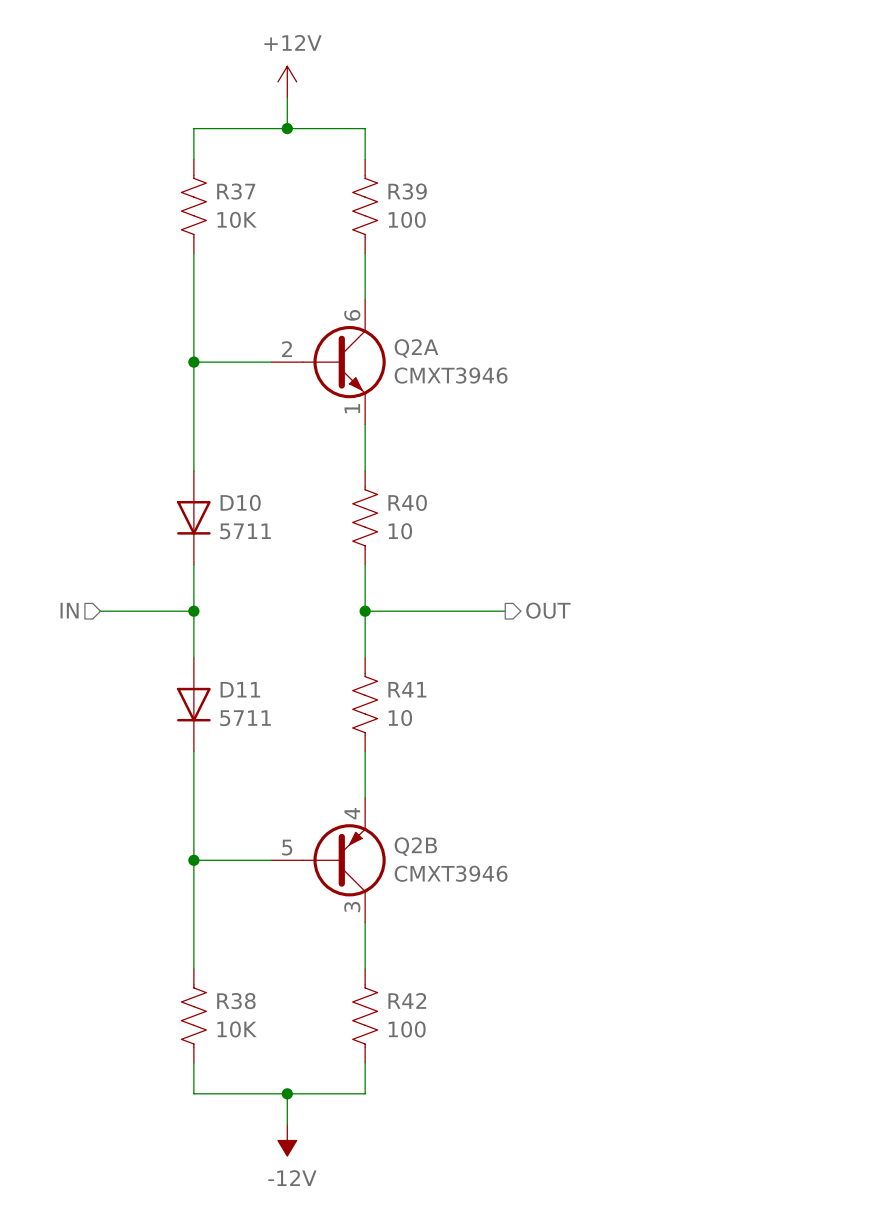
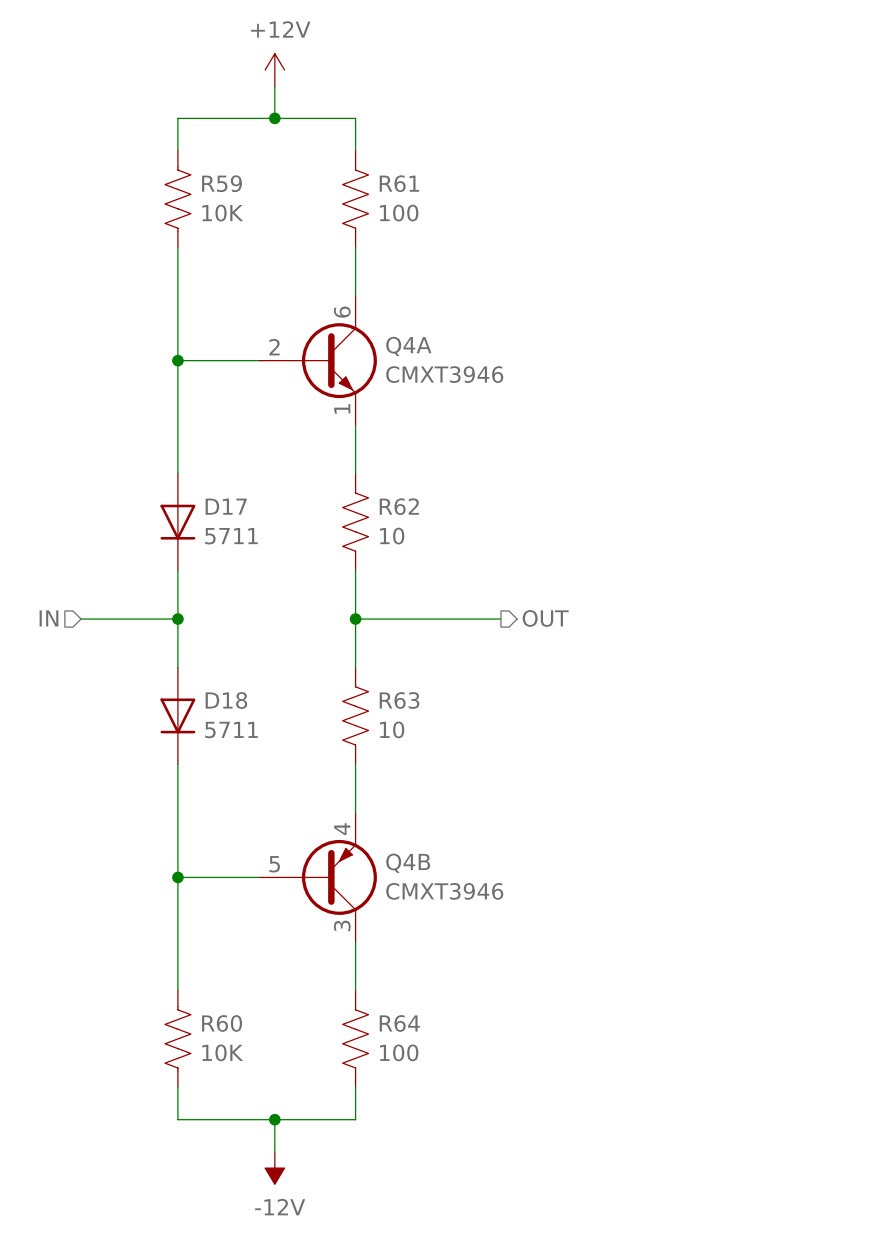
R37 name: R37 (236, 191) -> R59 (222, 183)
R39 name: R39 (407, 191) -> R61 (399, 183)
Q2A name: Q2A (416, 348) -> Q4A (408, 346)
D10 name: D10 (240, 502) -> D17 (226, 506)
R40 name: R40 (407, 502) -> R62 (399, 506)
D11 name: D11 (240, 689) -> D18 (226, 700)
R41 name: R41 (407, 689) -> R63 (399, 700)
Q2B name: Q2B (415, 846) -> Q4B (408, 863)
R42 name: R42 (407, 1000) -> R64 (399, 1023)
R38 name: R38 (236, 1001) -> R60 (222, 1023)

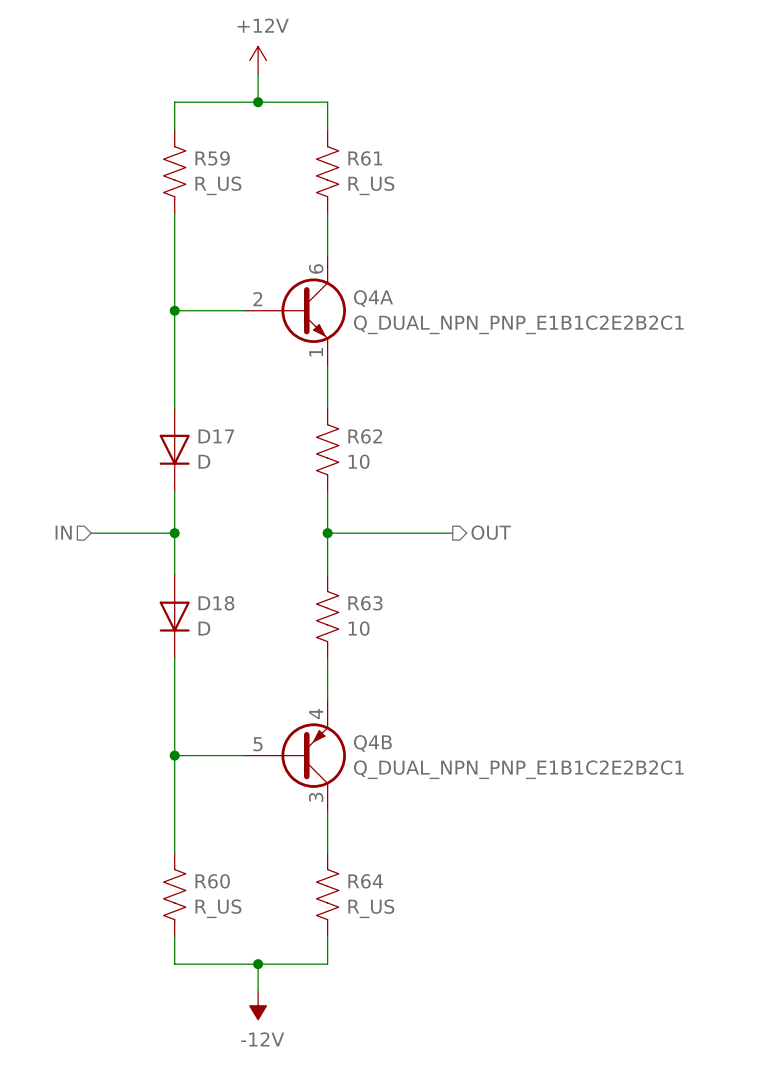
R59 value: 10K (222, 213) -> R_US (218, 185)
R61 value: 100 (399, 213) -> R_US (371, 185)
Q4A value: CMXT3946 (444, 374) -> Q_DUAL_NPN_PNP_E1B1C2E2B2C1 (518, 324)
D17 value: 5711 (231, 536) -> D (204, 461)
D18 value: 5711 (231, 730) -> D (204, 628)
Q4B value: CMXT3946 (444, 891) -> Q_DUAL_NPN_PNP_E1B1C2E2B2C1 (518, 769)
R60 value: 10K (222, 1052) -> R_US (218, 908)
R64 value: 100 (399, 1052) -> R_US (371, 908)

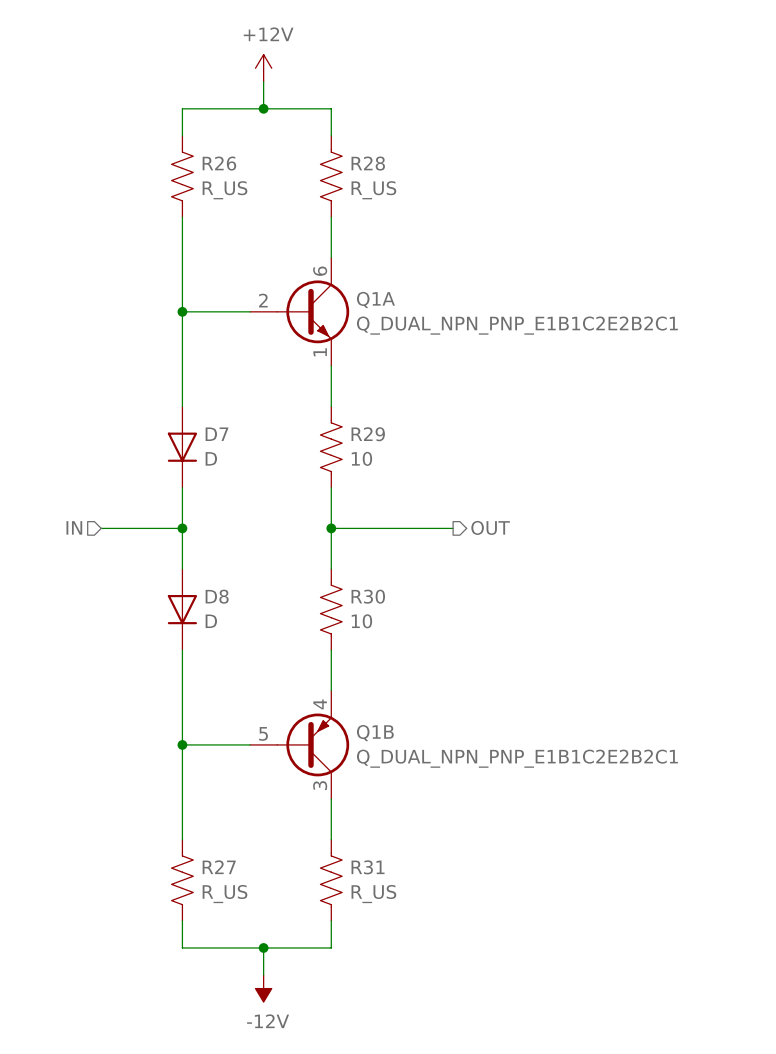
R59 name: R59 (212, 158) -> R26 (219, 163)
R61 name: R61 (365, 158) -> R28 (368, 163)
Q4A name: Q4A (373, 298) -> Q1A (375, 299)
D17 name: D17 (216, 436) -> D7 (216, 434)
R62 name: R62 (365, 436) -> R29 (368, 434)
D18 name: D18 (216, 603) -> D8 (217, 596)
R63 name: R63 (365, 603) -> R30 (368, 596)
Q4B name: Q4B (372, 743) -> Q1B (375, 733)
R60 name: R60 (212, 881) -> R27 (219, 867)
R64 name: R64 (365, 881) -> R31 (368, 867)

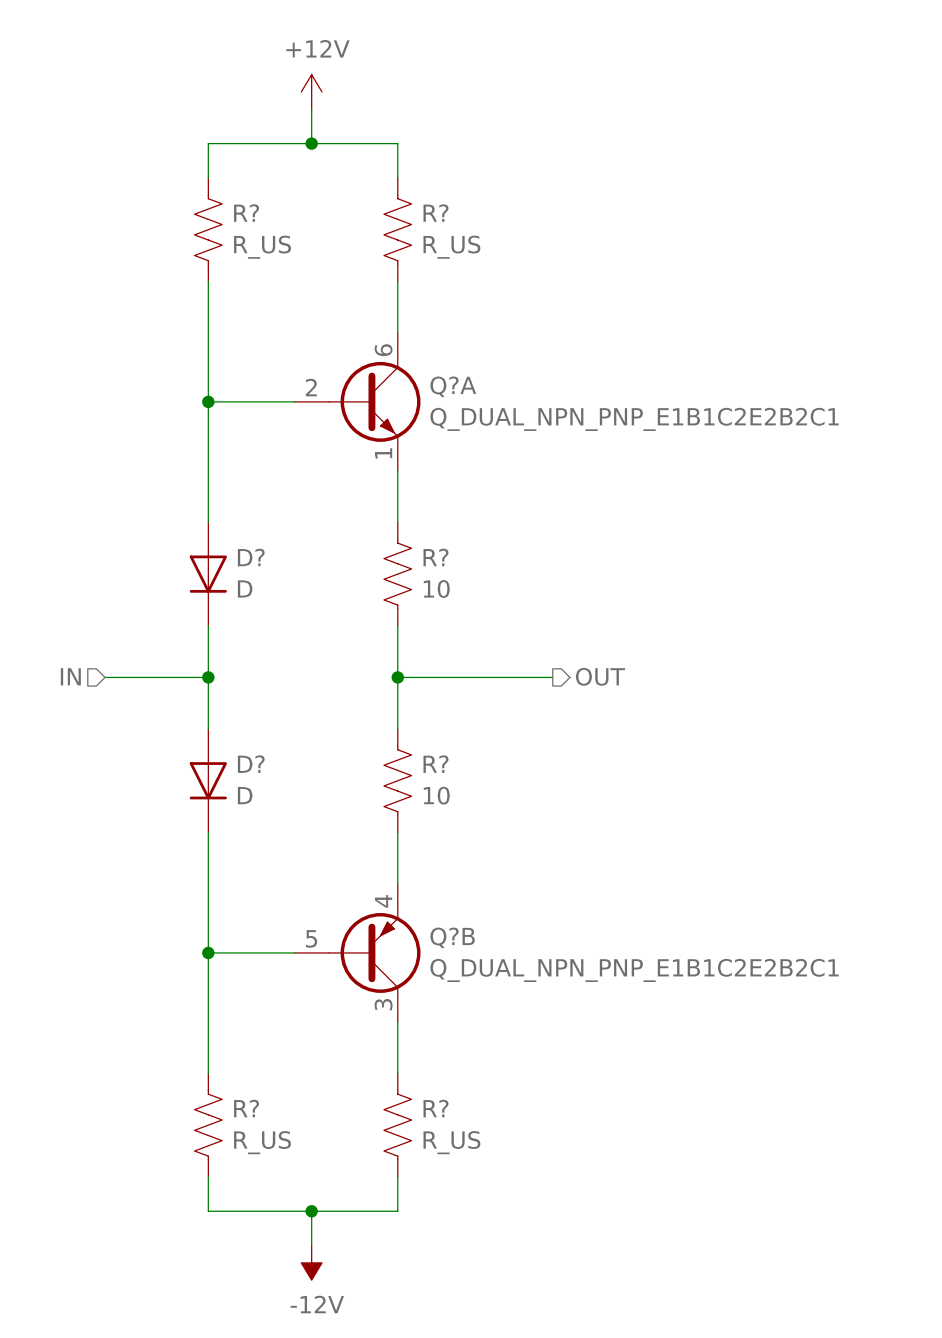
R26 name: R26 (219, 163) -> R? (246, 213)
R28 name: R28 (368, 163) -> R? (435, 213)
Q1A name: Q1A (375, 299) -> Q?A (453, 386)
D7 name: D7 (216, 434) -> D? (251, 557)
R29 name: R29 (368, 434) -> R? (435, 557)
D8 name: D8 (217, 596) -> D? (251, 764)
R30 name: R30 (368, 596) -> R? (435, 764)
Q1B name: Q1B (375, 733) -> Q?B (452, 937)
R27 name: R27 (219, 867) -> R? (246, 1108)
R31 name: R31 (368, 867) -> R? (435, 1108)

